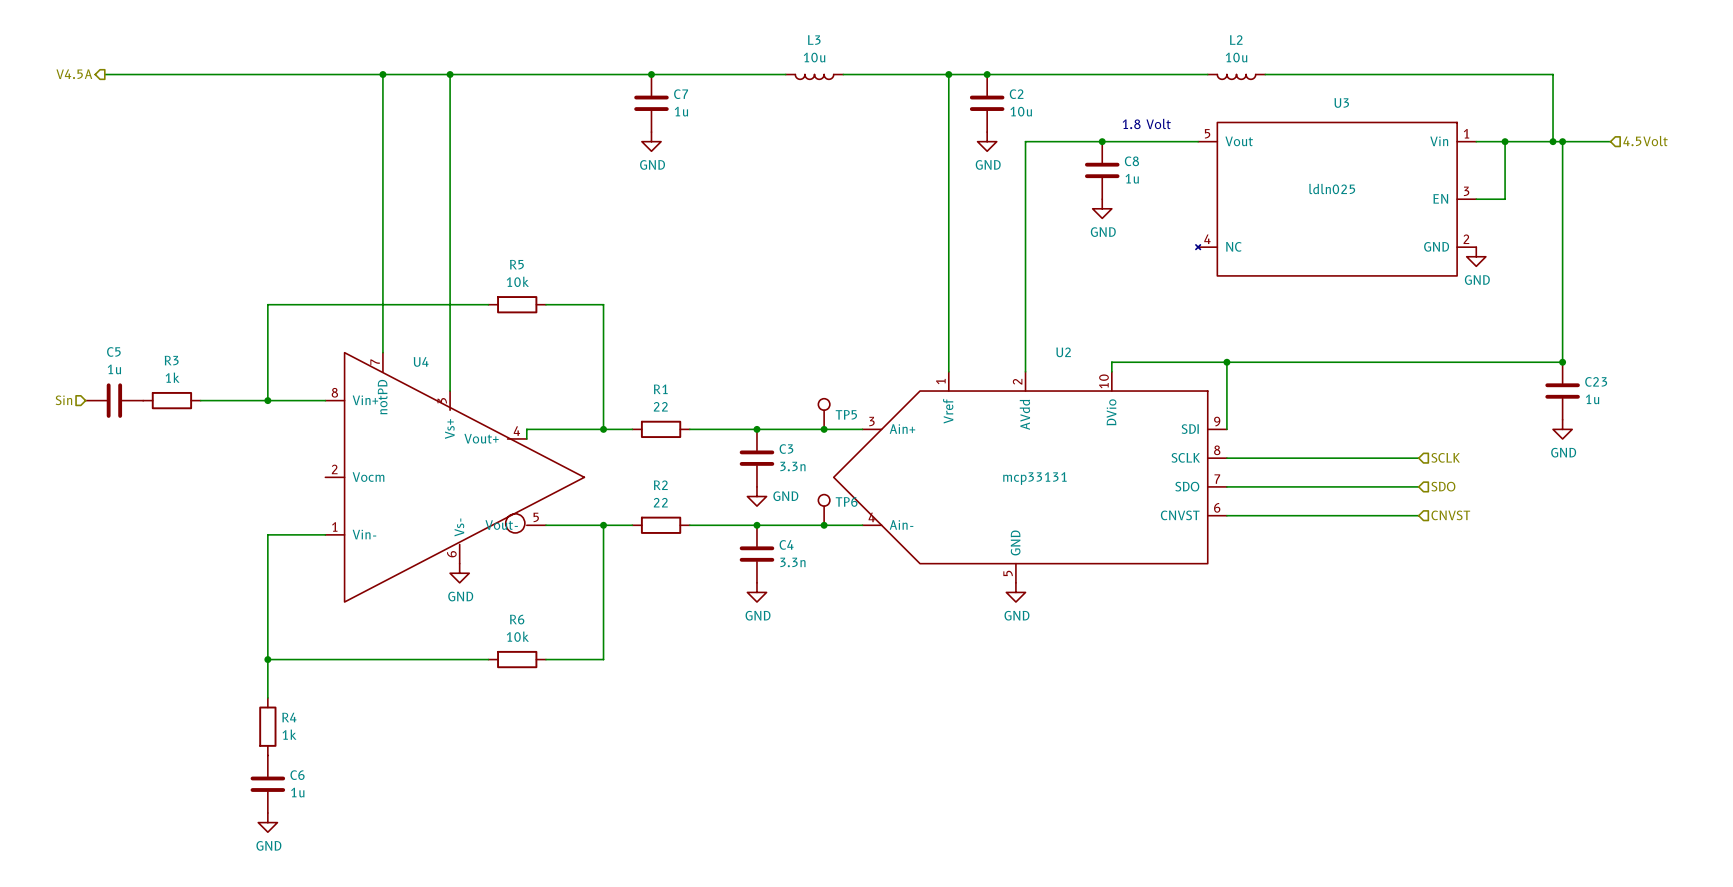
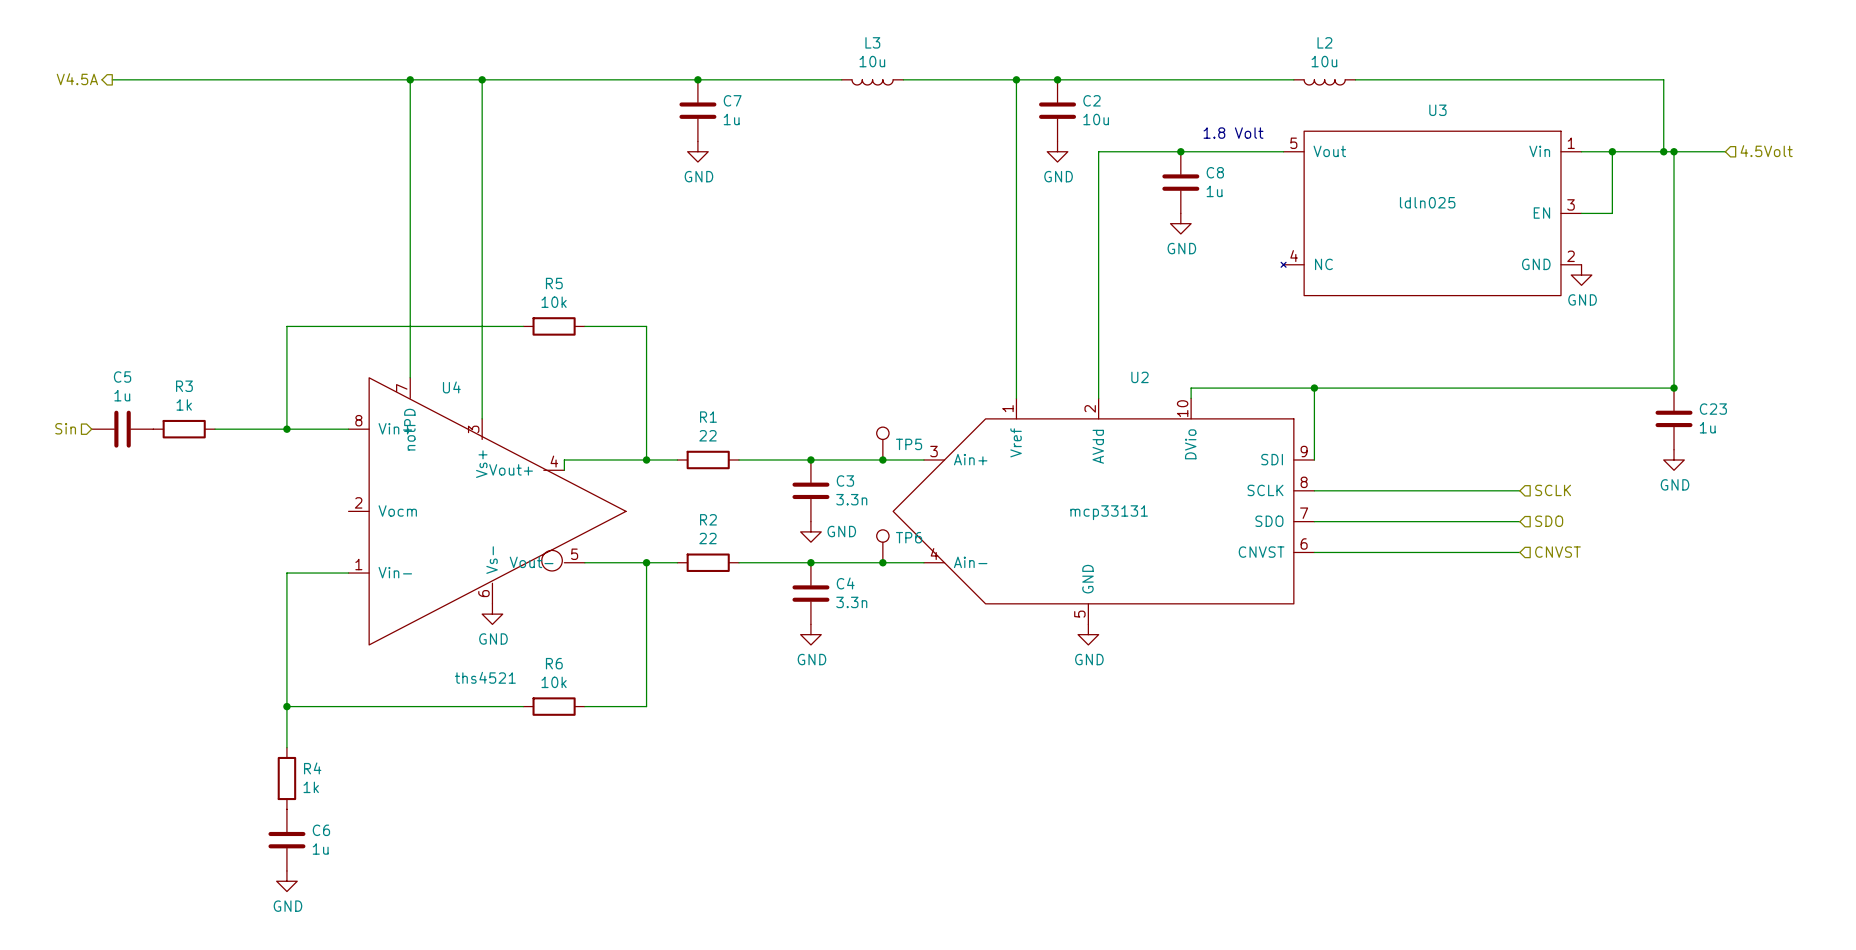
U4 value: none -> ths4521 (485, 677)

